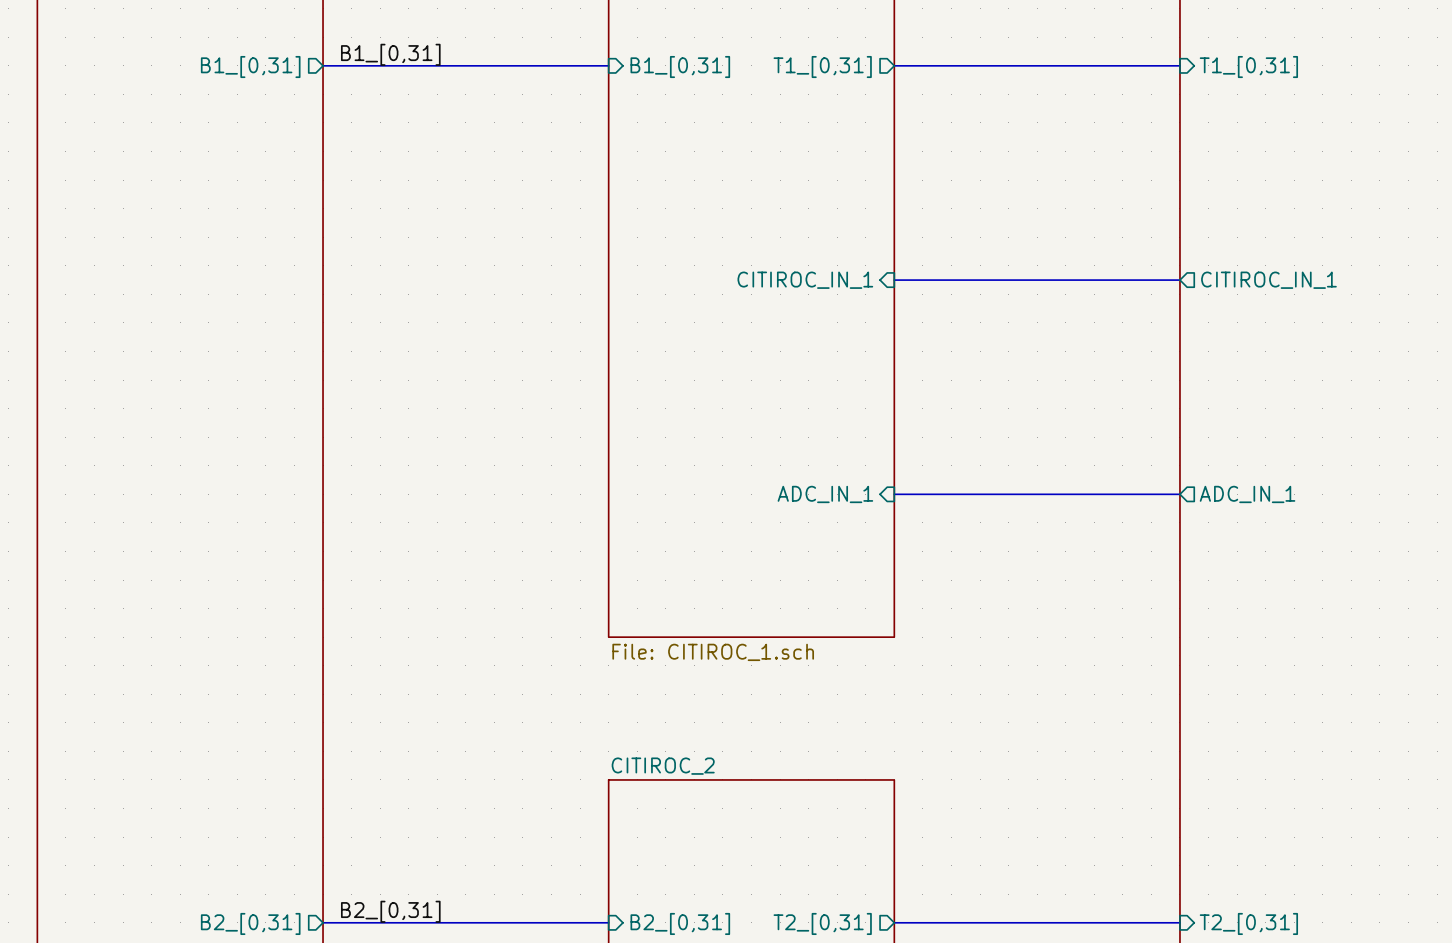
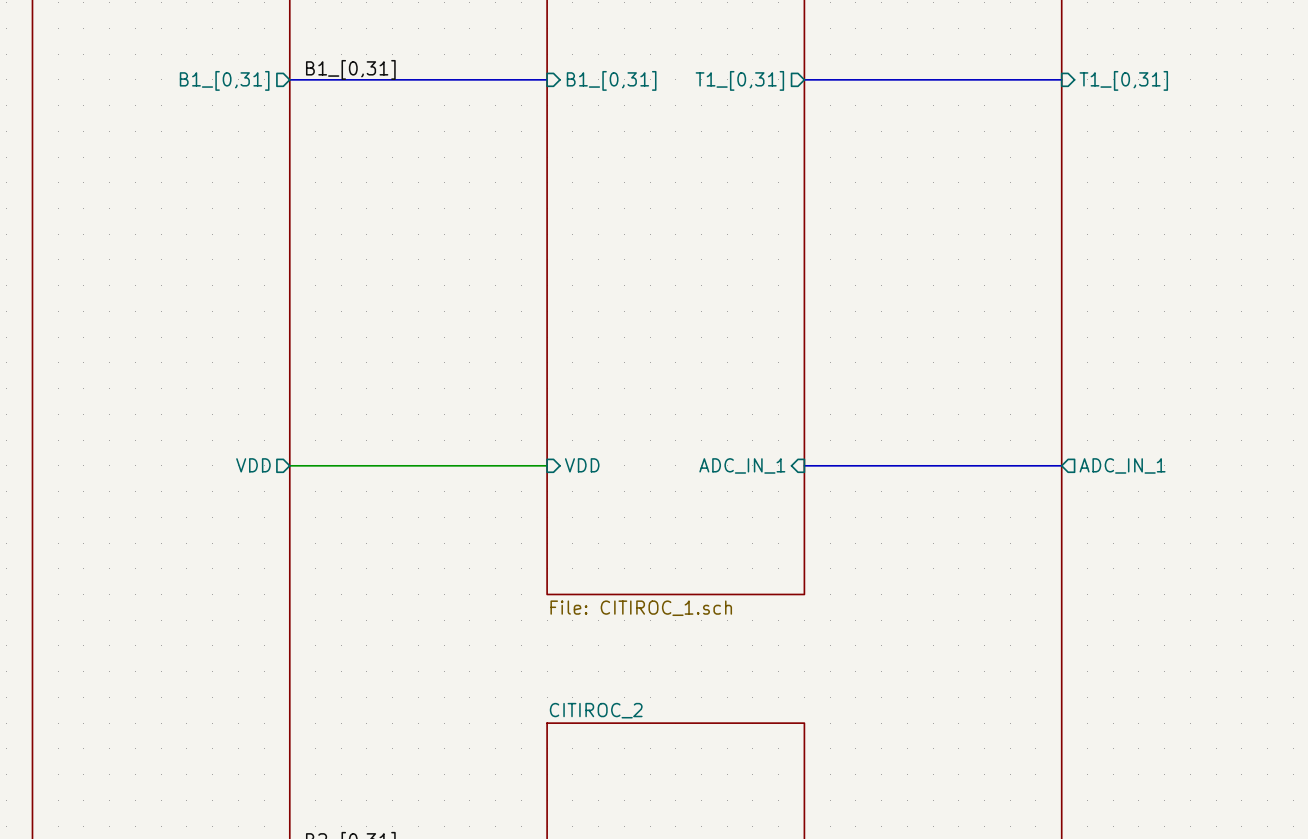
sheet pin: CITIROC_IN_1 (805, 280) -> none
bus: (894, 280) (1179, 280) -> none
sheet pin: CITIROC_IN_1 (1268, 280) -> none
sheet pin: none -> VDD (253, 465)
sheet pin: none -> VDD (582, 465)
wire: none -> (289, 465) (547, 465)

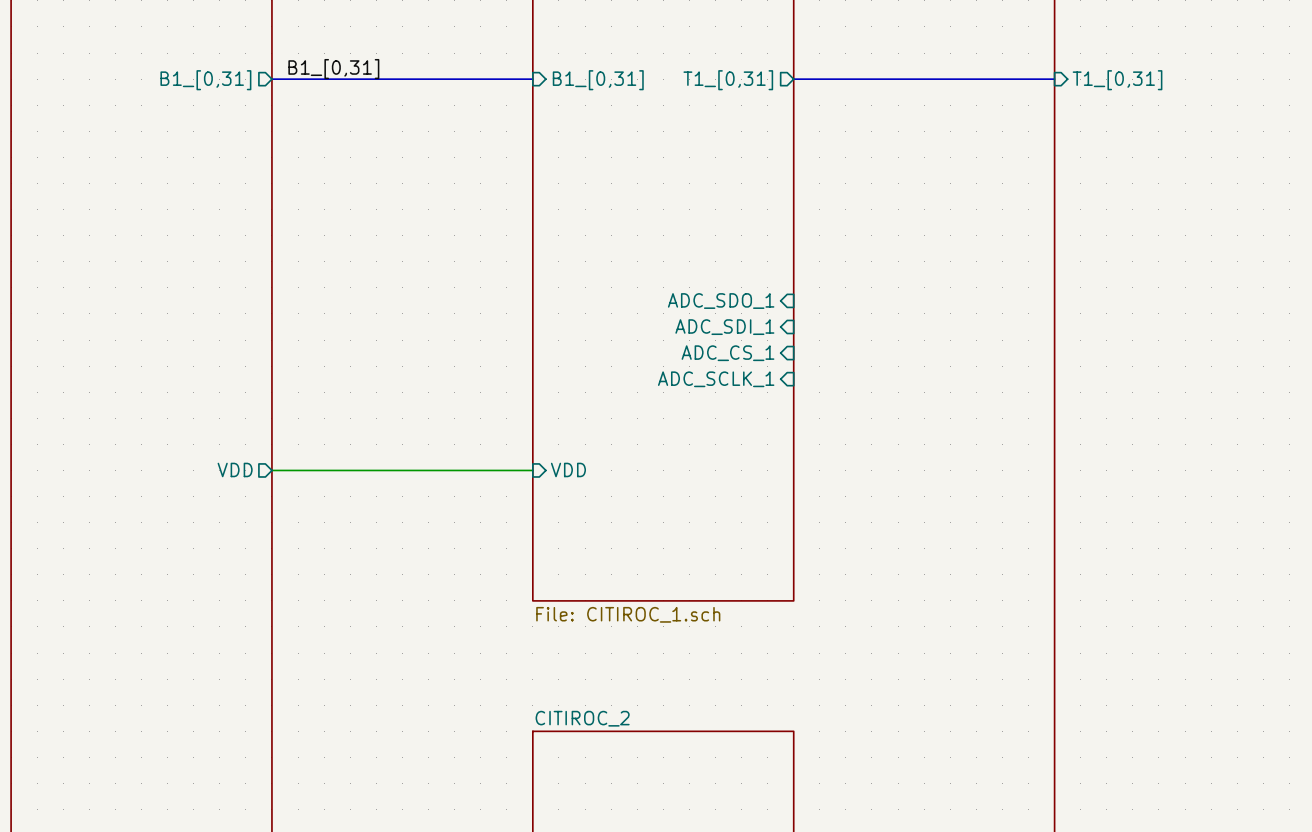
sheet pin: none -> ADC_SDO_1 (721, 301)
sheet pin: none -> ADC_SDI_1 (724, 327)
sheet pin: none -> ADC_CS_1 (727, 353)
sheet pin: none -> ADC_SCLK_1 (716, 379)
sheet pin: ADC_IN_1 (742, 465) -> none
bus: (804, 465) (1061, 465) -> none
sheet pin: ADC_IN_1 (1122, 465) -> none

